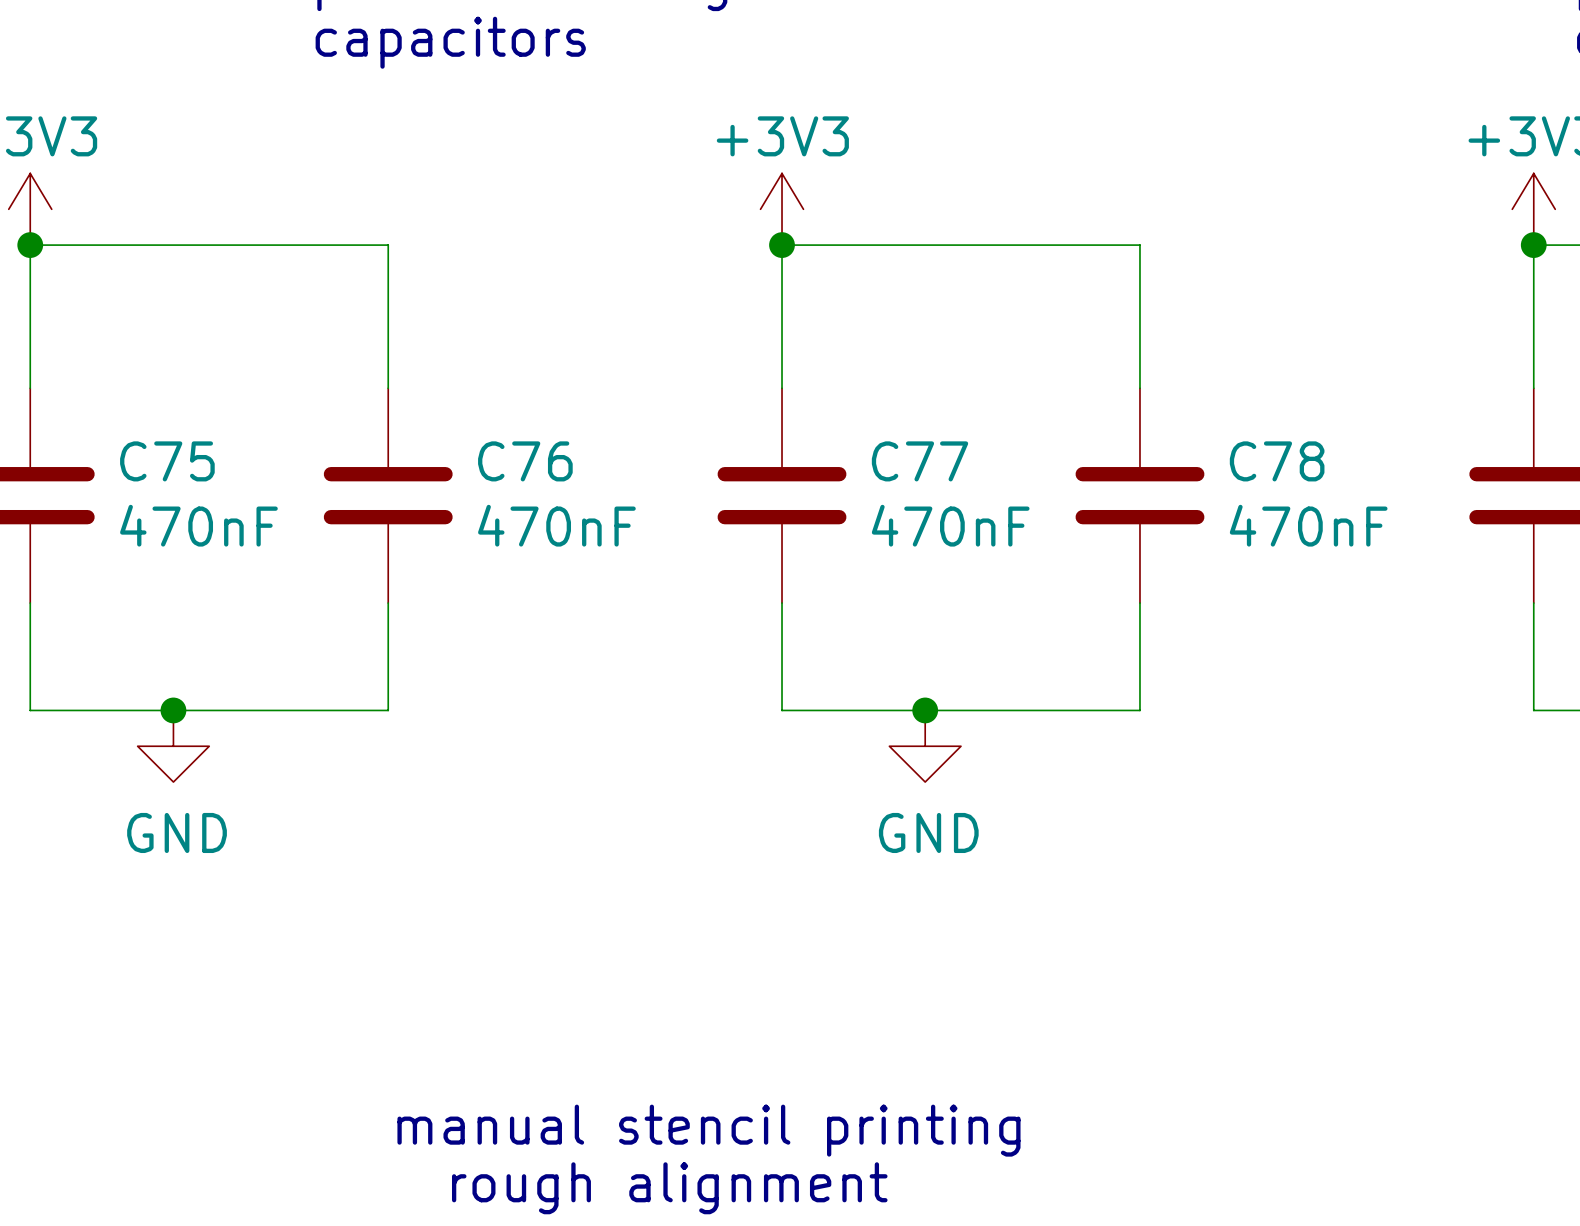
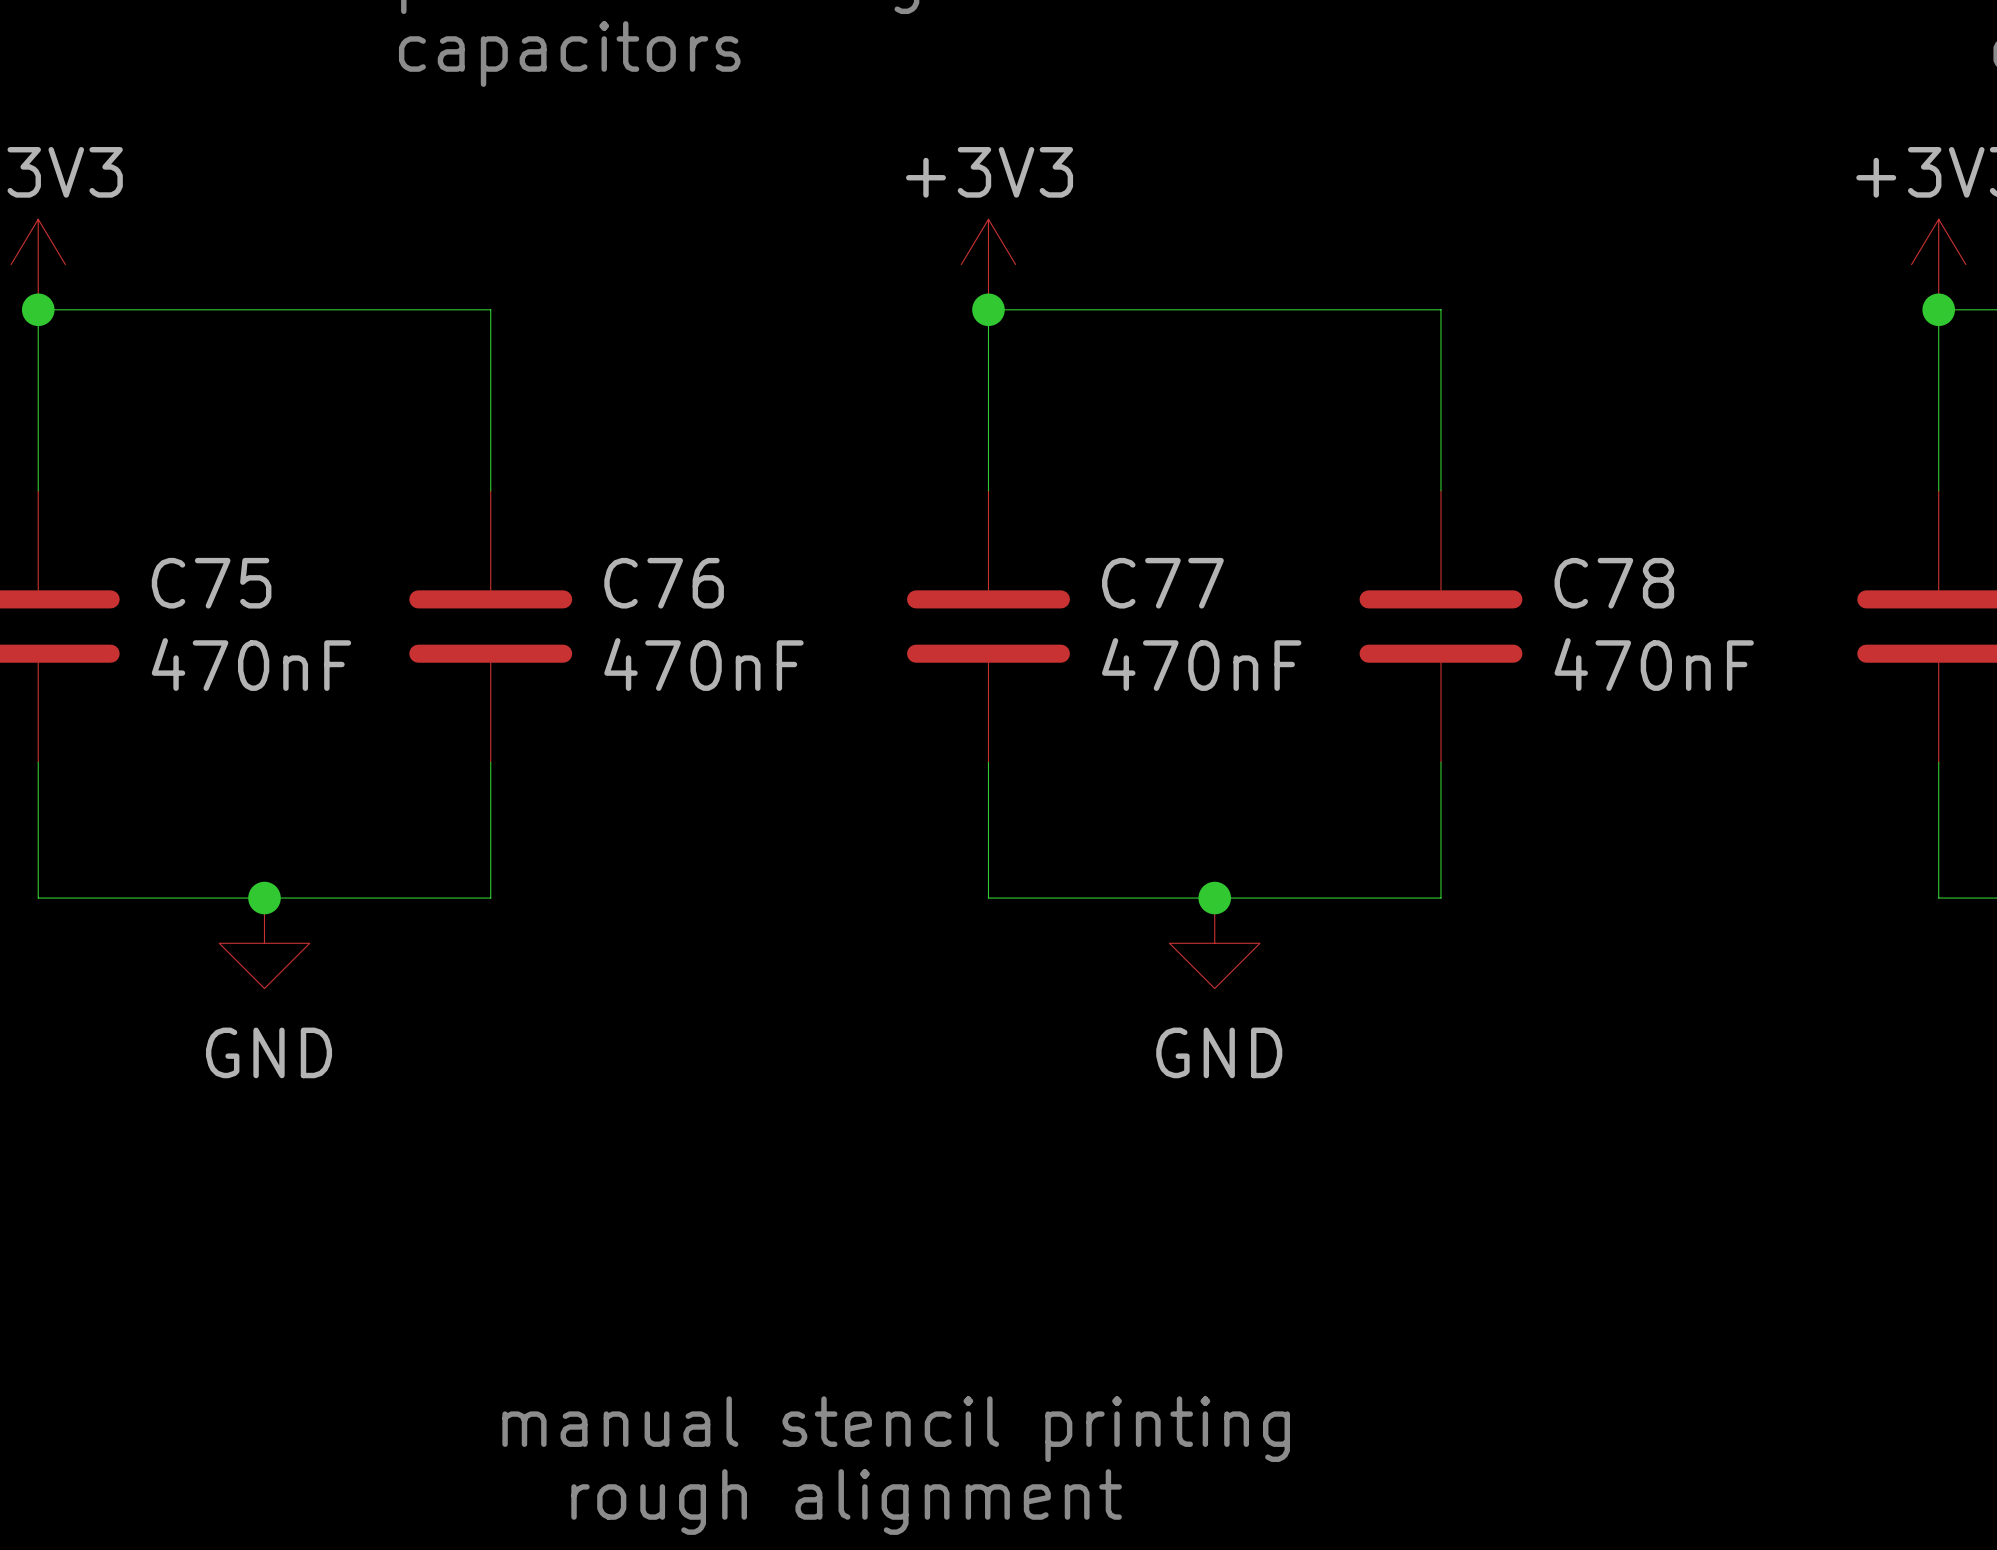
junction position: (173, 710) -> (264, 898)
junction position: (925, 710) -> (1214, 898)
power symbol position: GND (173, 746) -> GND (264, 943)
power symbol position: GND (925, 746) -> GND (1214, 943)

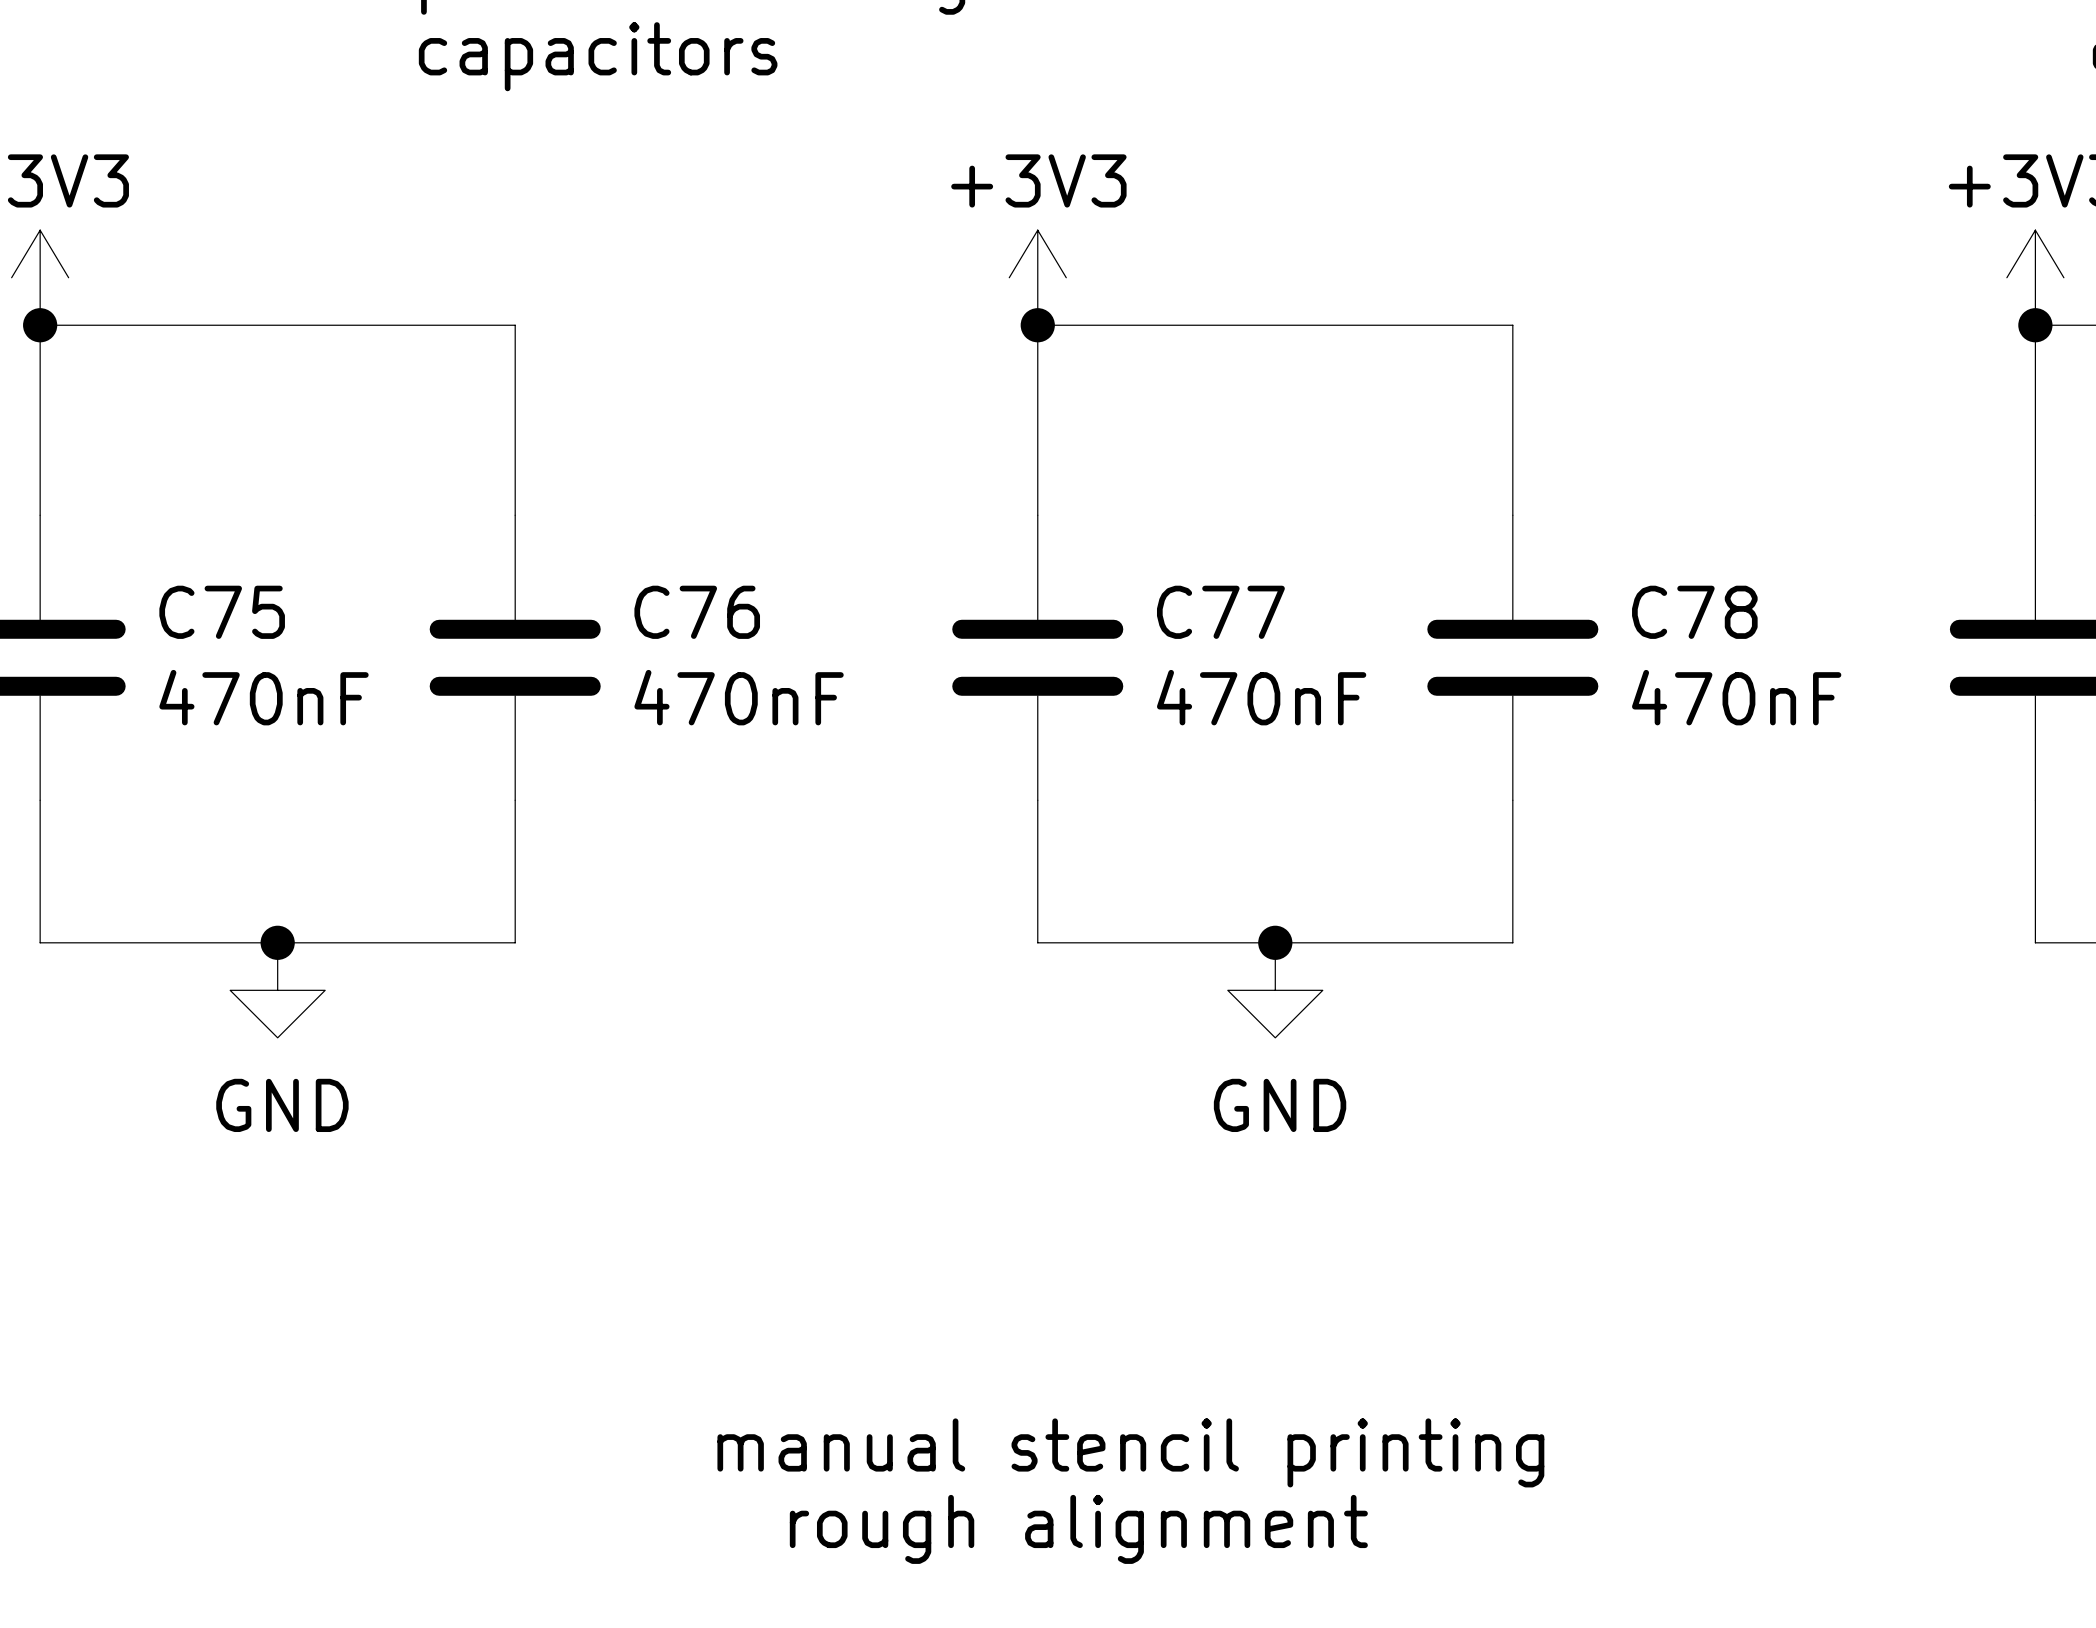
text position: manual stencil printing (896, 1429) -> manual stencil printing (1130, 1452)
text position: rough alignment (846, 1502) -> rough alignment (1078, 1529)

